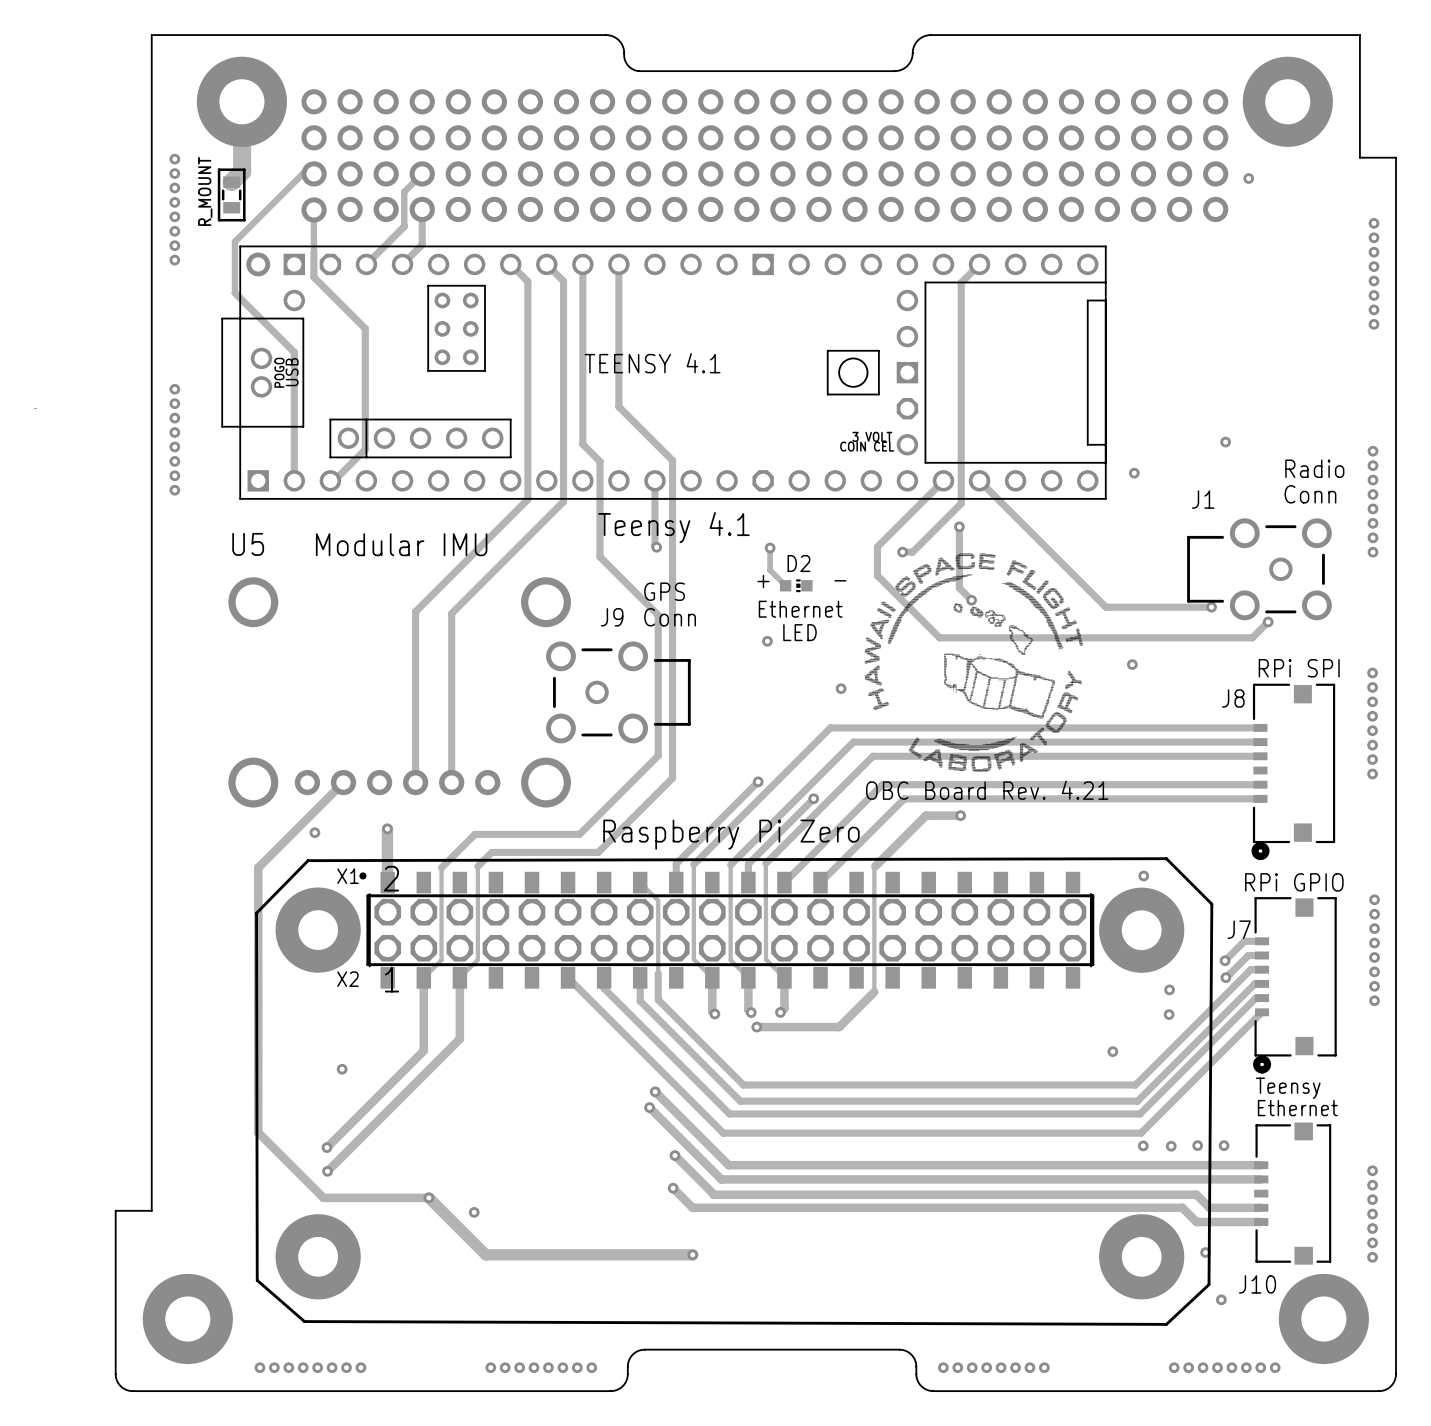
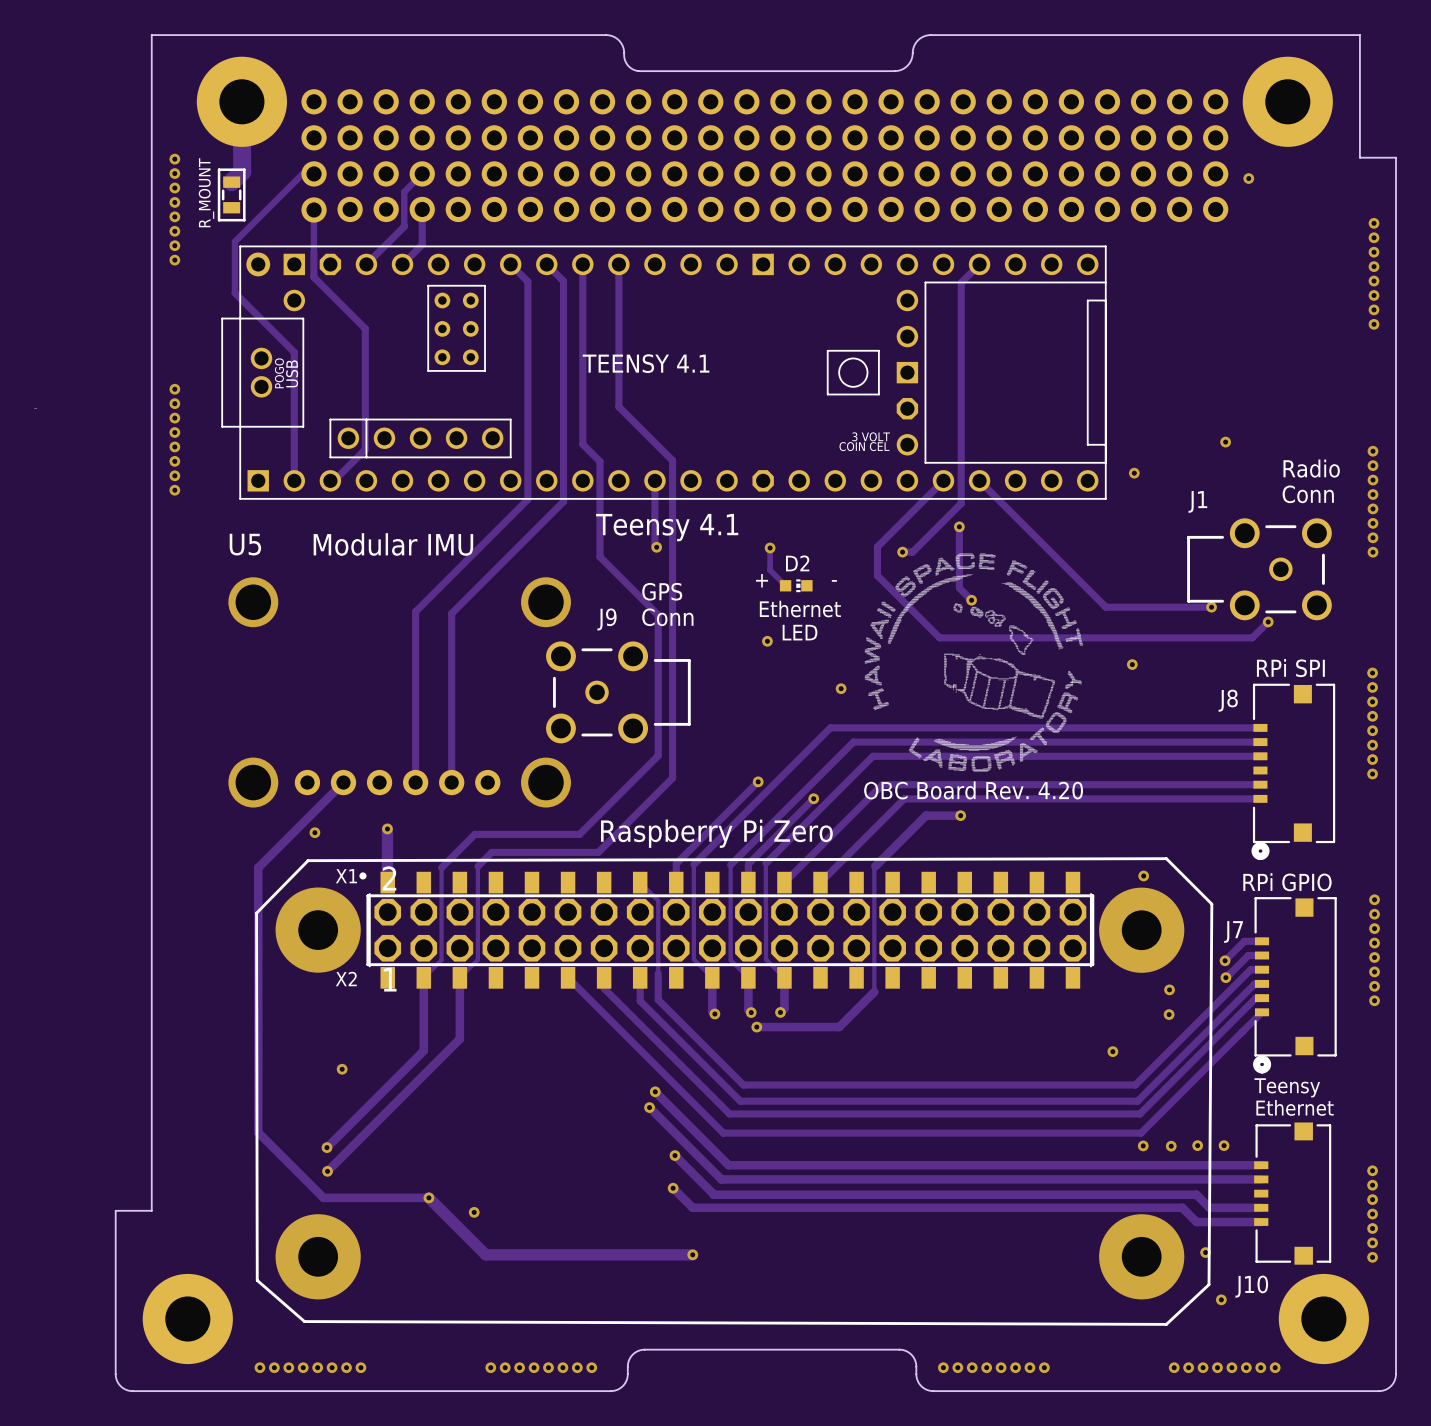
text: OBC Board Rev. 4.21 (987, 790) -> OBC Board Rev. 4.20 (973, 790)

